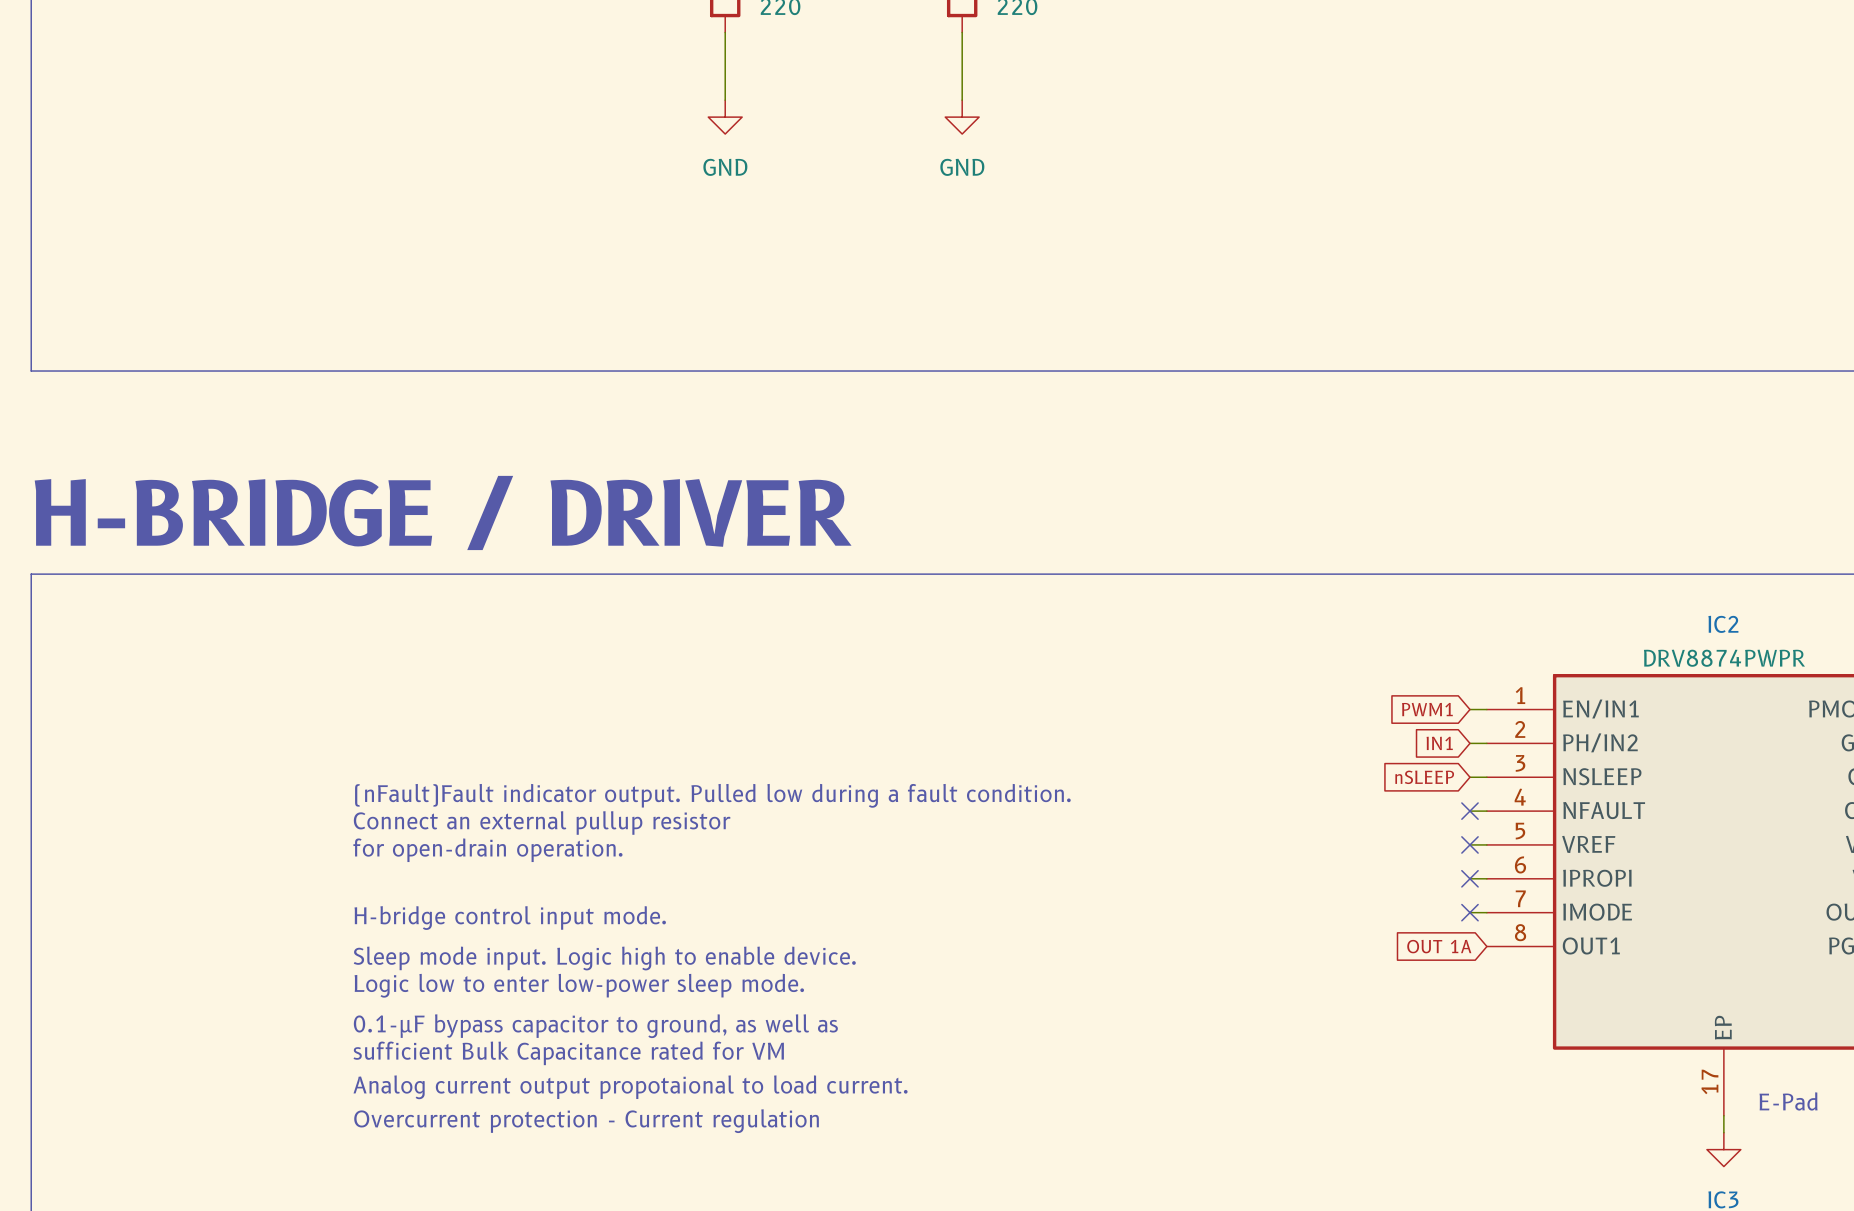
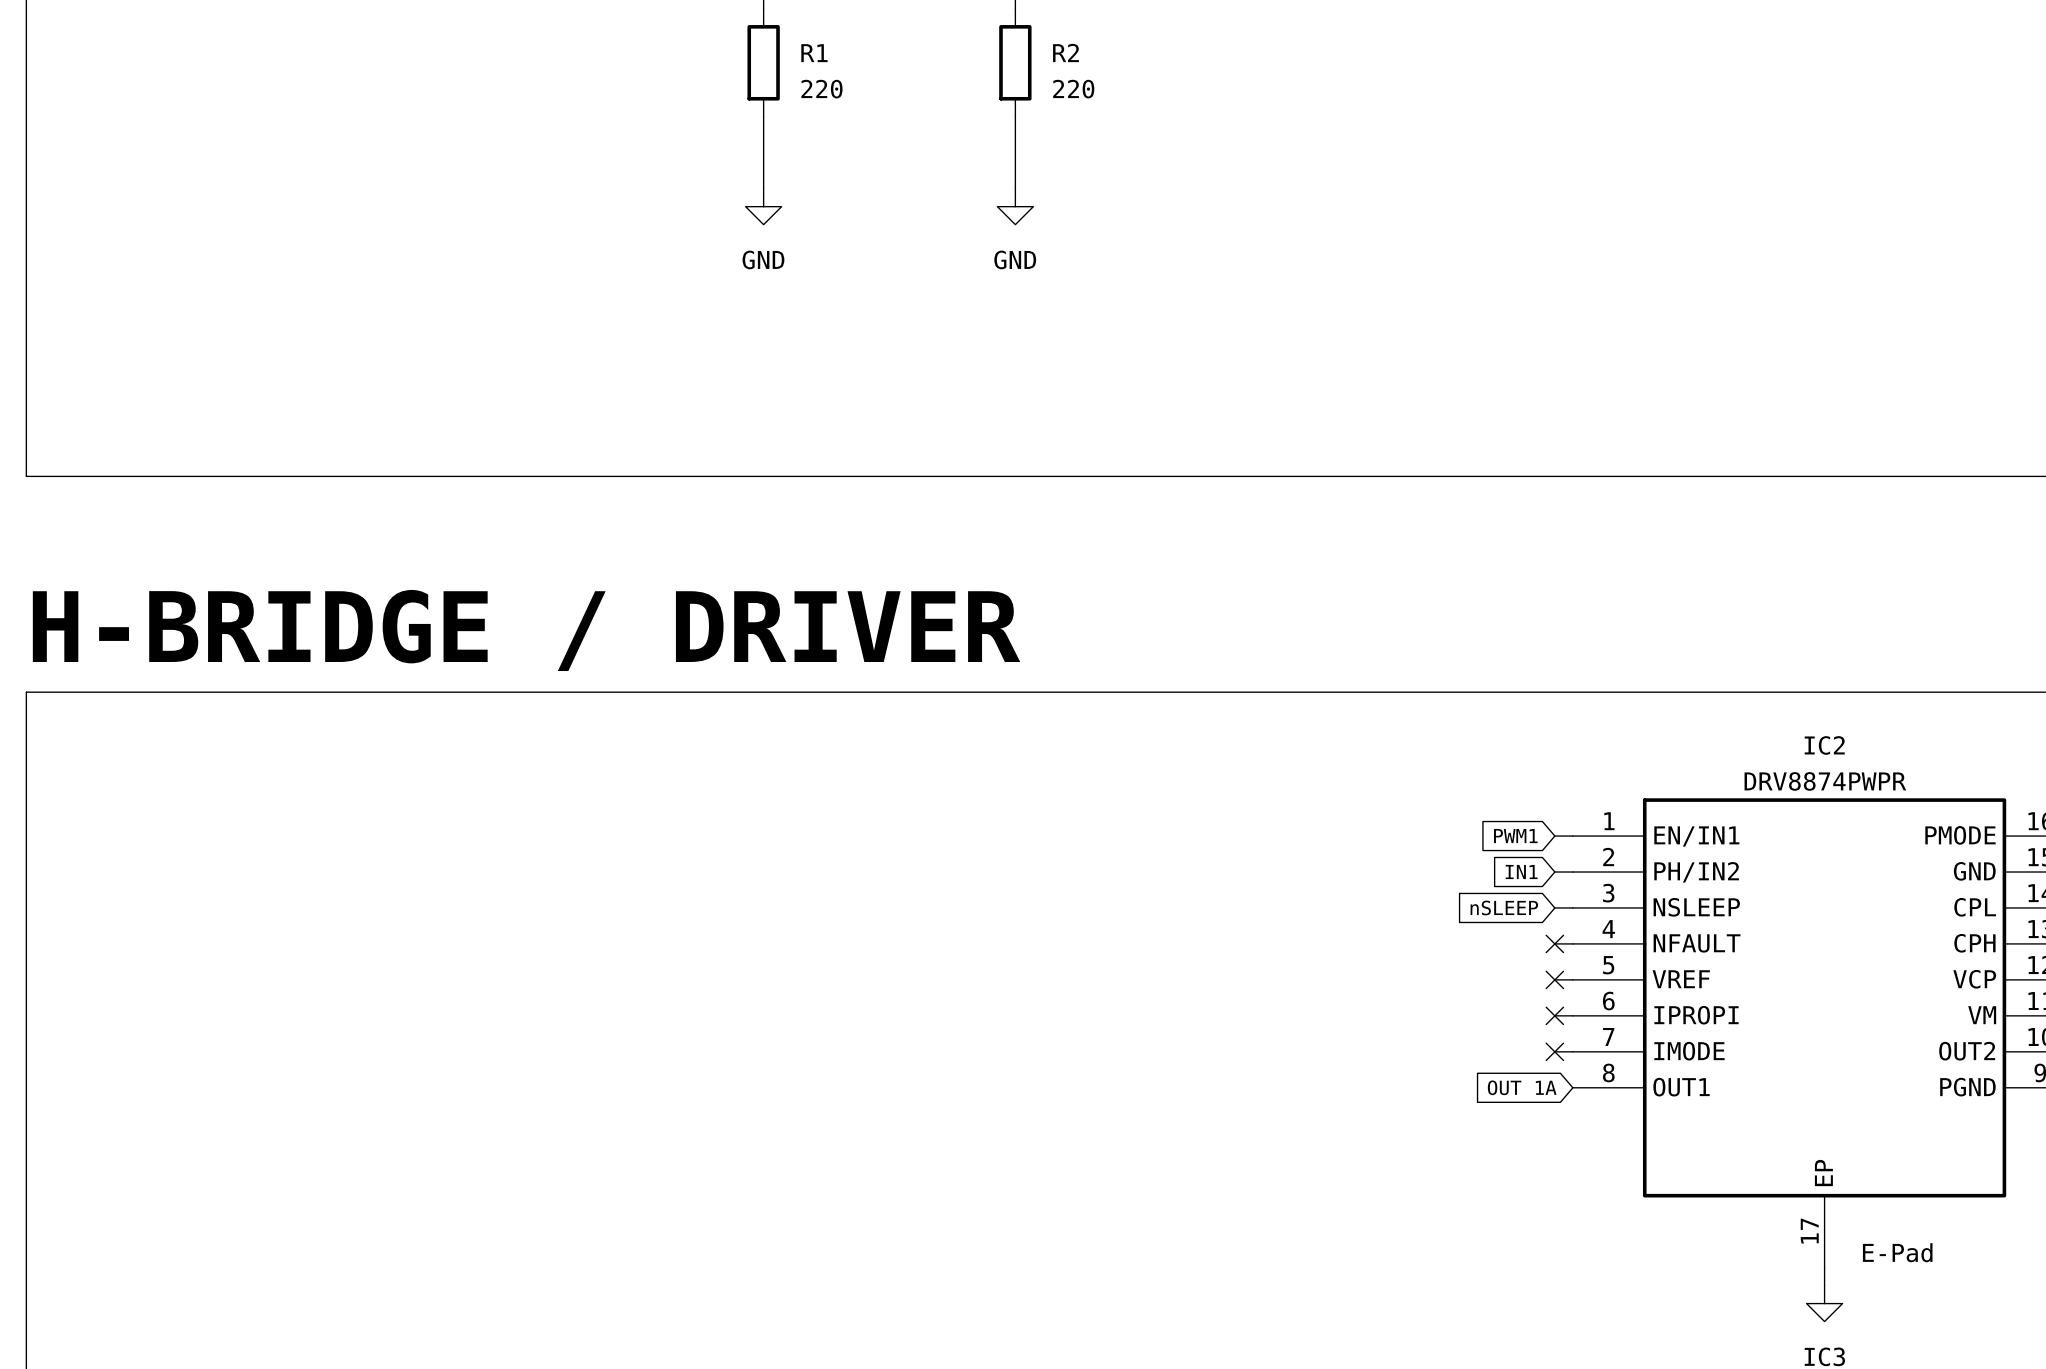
text: (nFault)Fault indicator output. Pulled low during a fault condition. (712, 795) -> none
text: Connect an external pullup resistor (542, 822) -> none
text: for open-drain operation. (487, 850) -> none
text: H-bridge control input mode. (510, 918) -> none
text: Sleep mode input. Logic high to enable device. (604, 958) -> none
text: Logic low to enter low-power sleep mode. (579, 985) -> none
text: 0.1-µF bypass capacitor to ground, as well as (595, 1026) -> none
text: sufficient Bulk Capacitance rated for VM (568, 1053) -> none
text: Analog current output propotaional to load current. (630, 1087) -> none
text: Overcurrent protection - Current regulation (586, 1121) -> none

